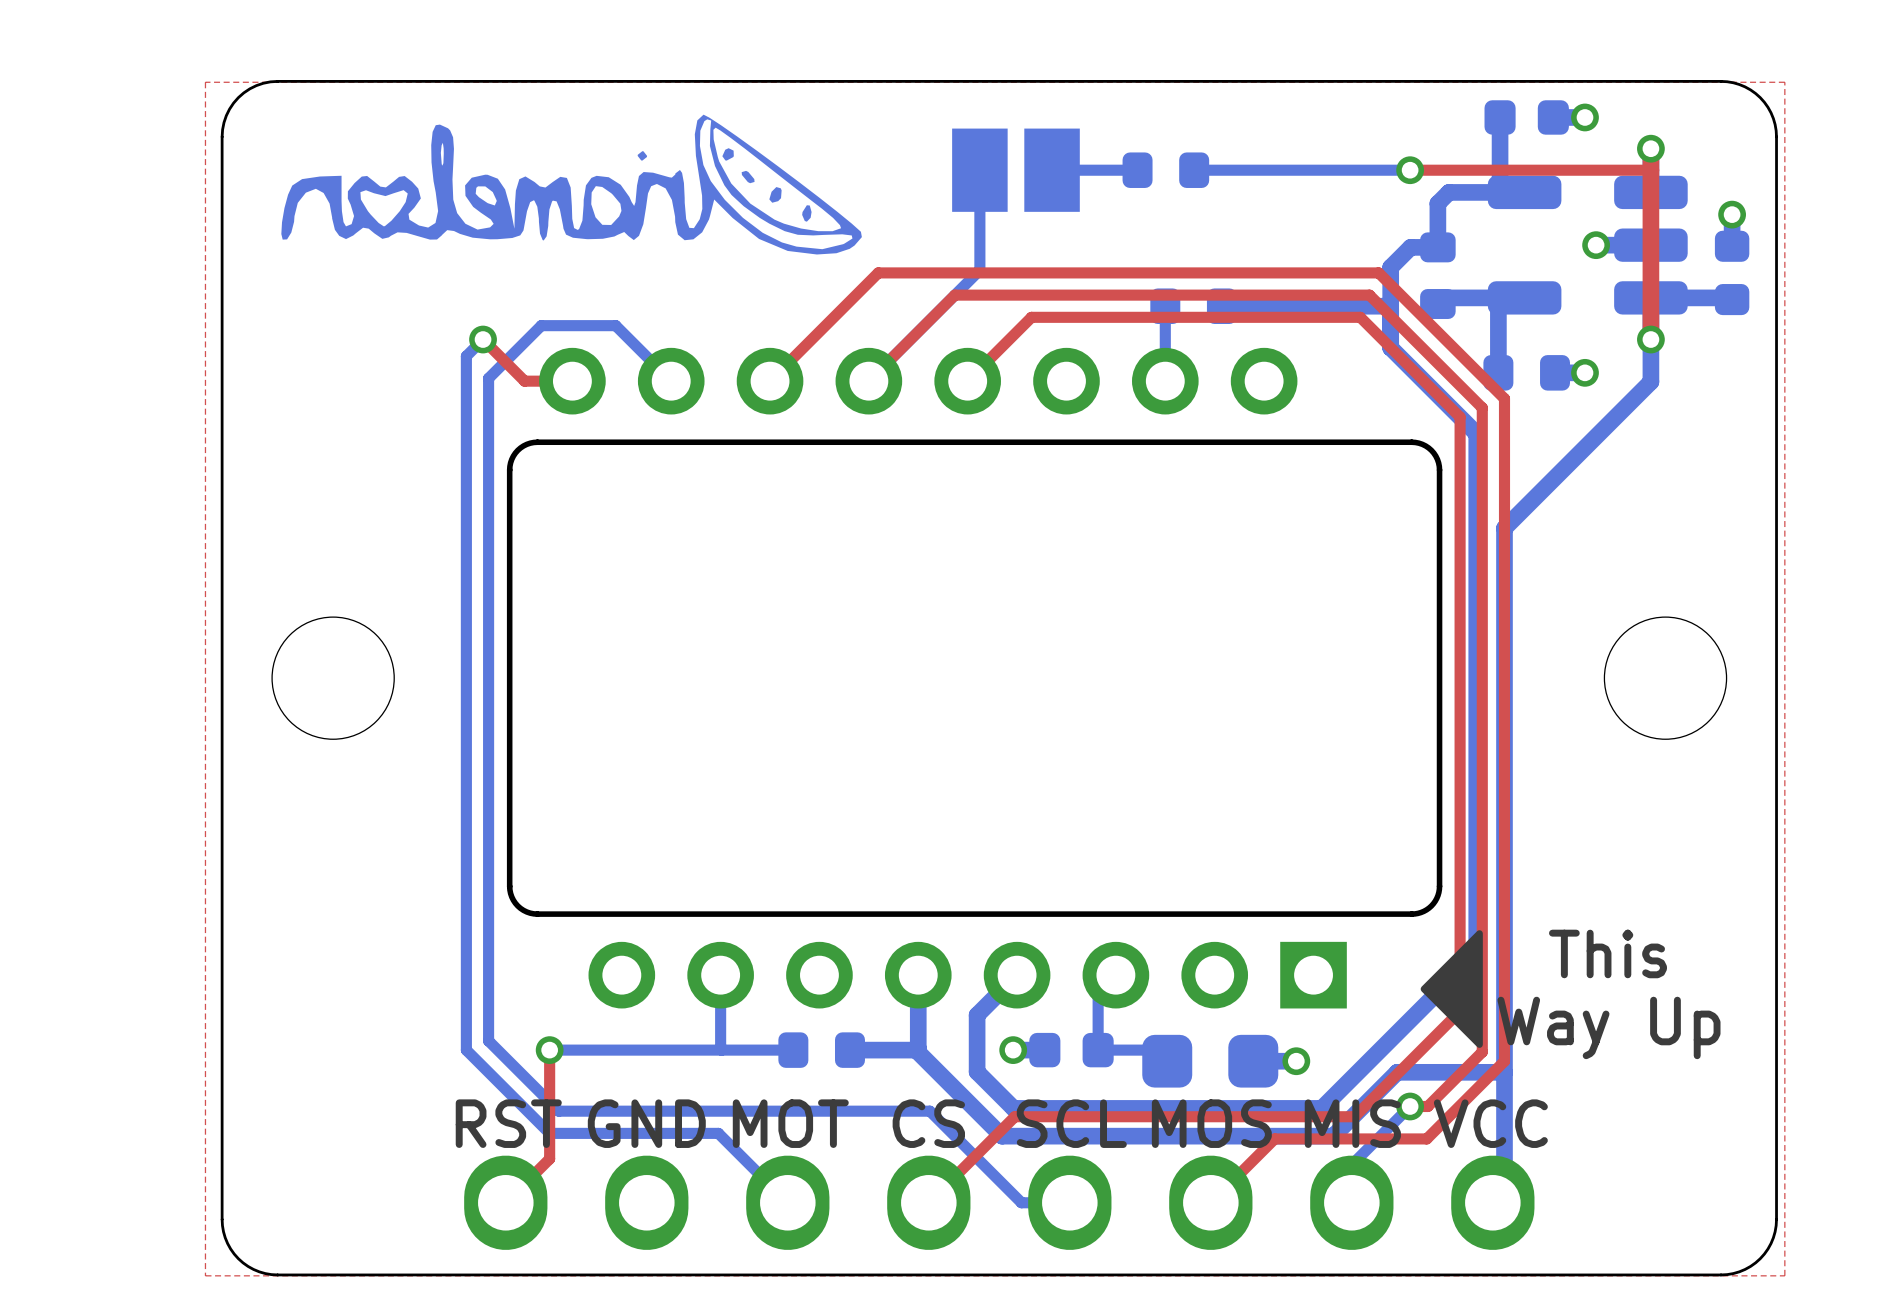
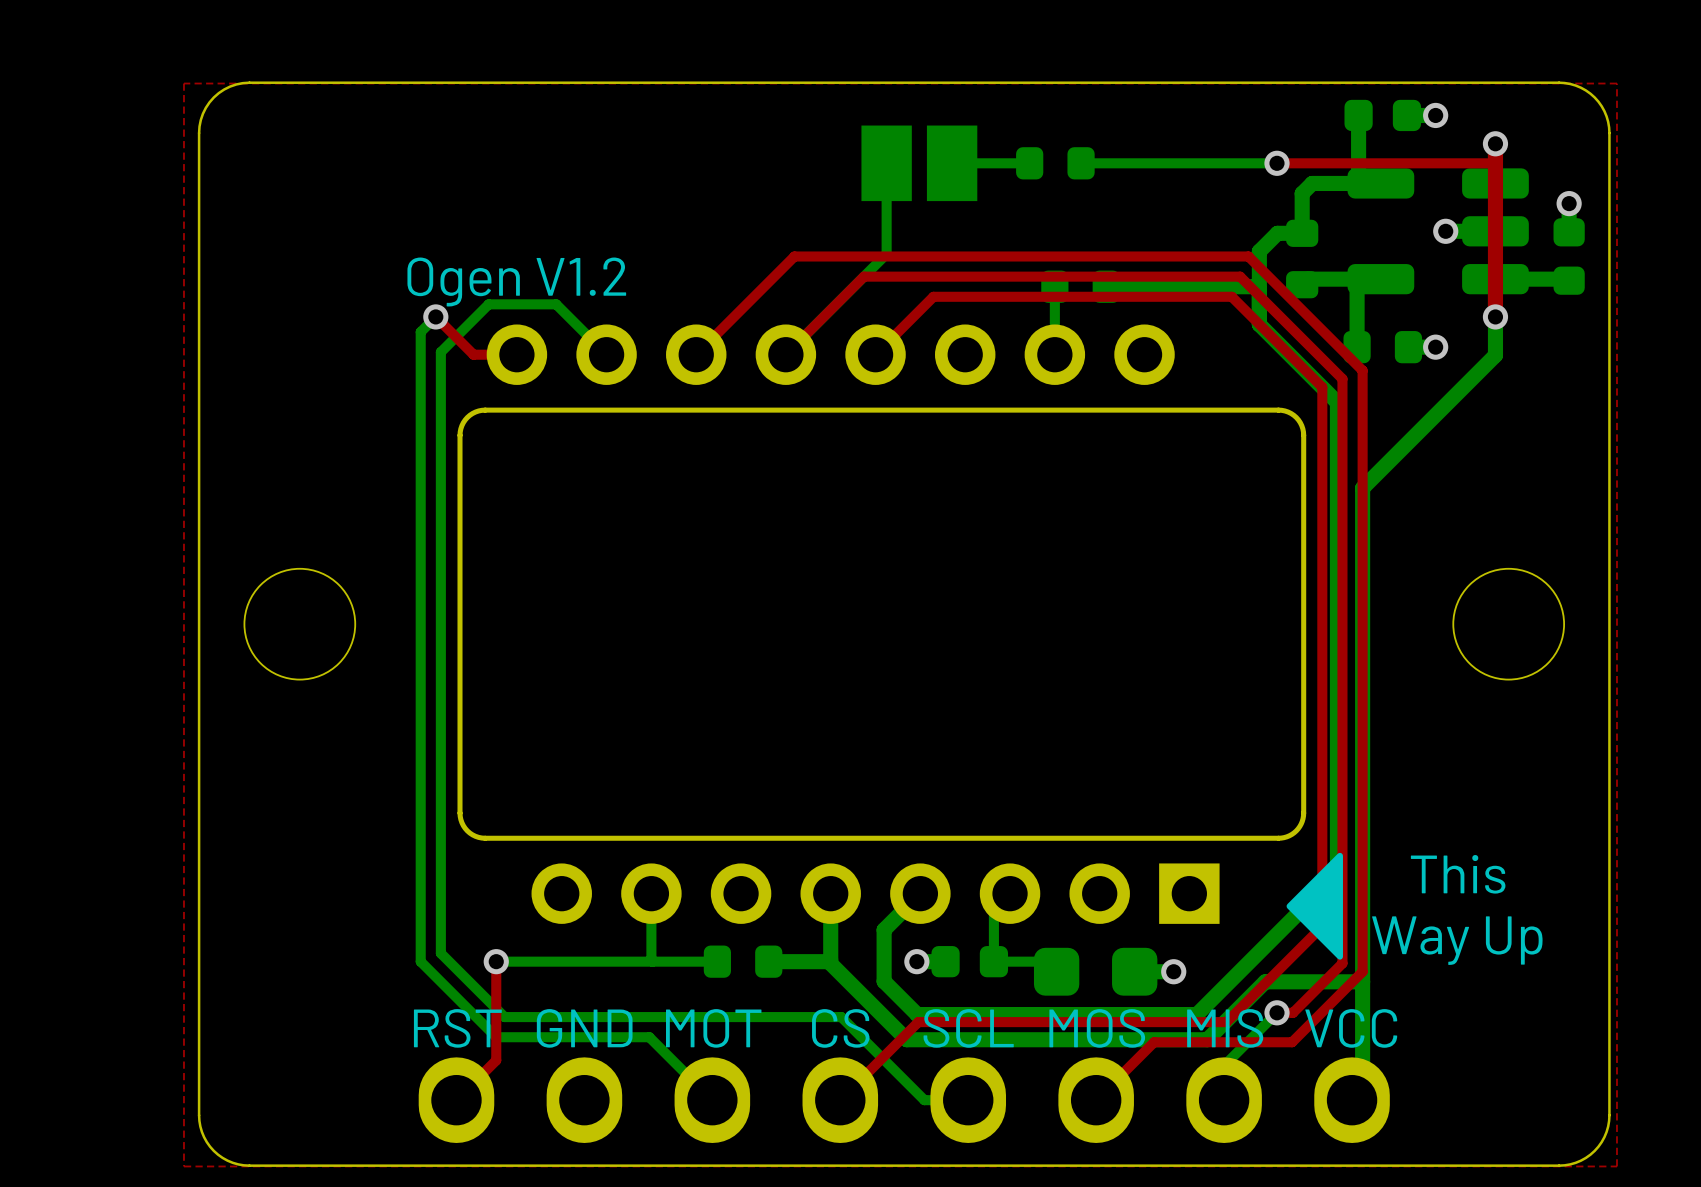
drawing: [281, 114, 862, 255] -> none
text: none -> Ogen V1.2 (516, 281)

